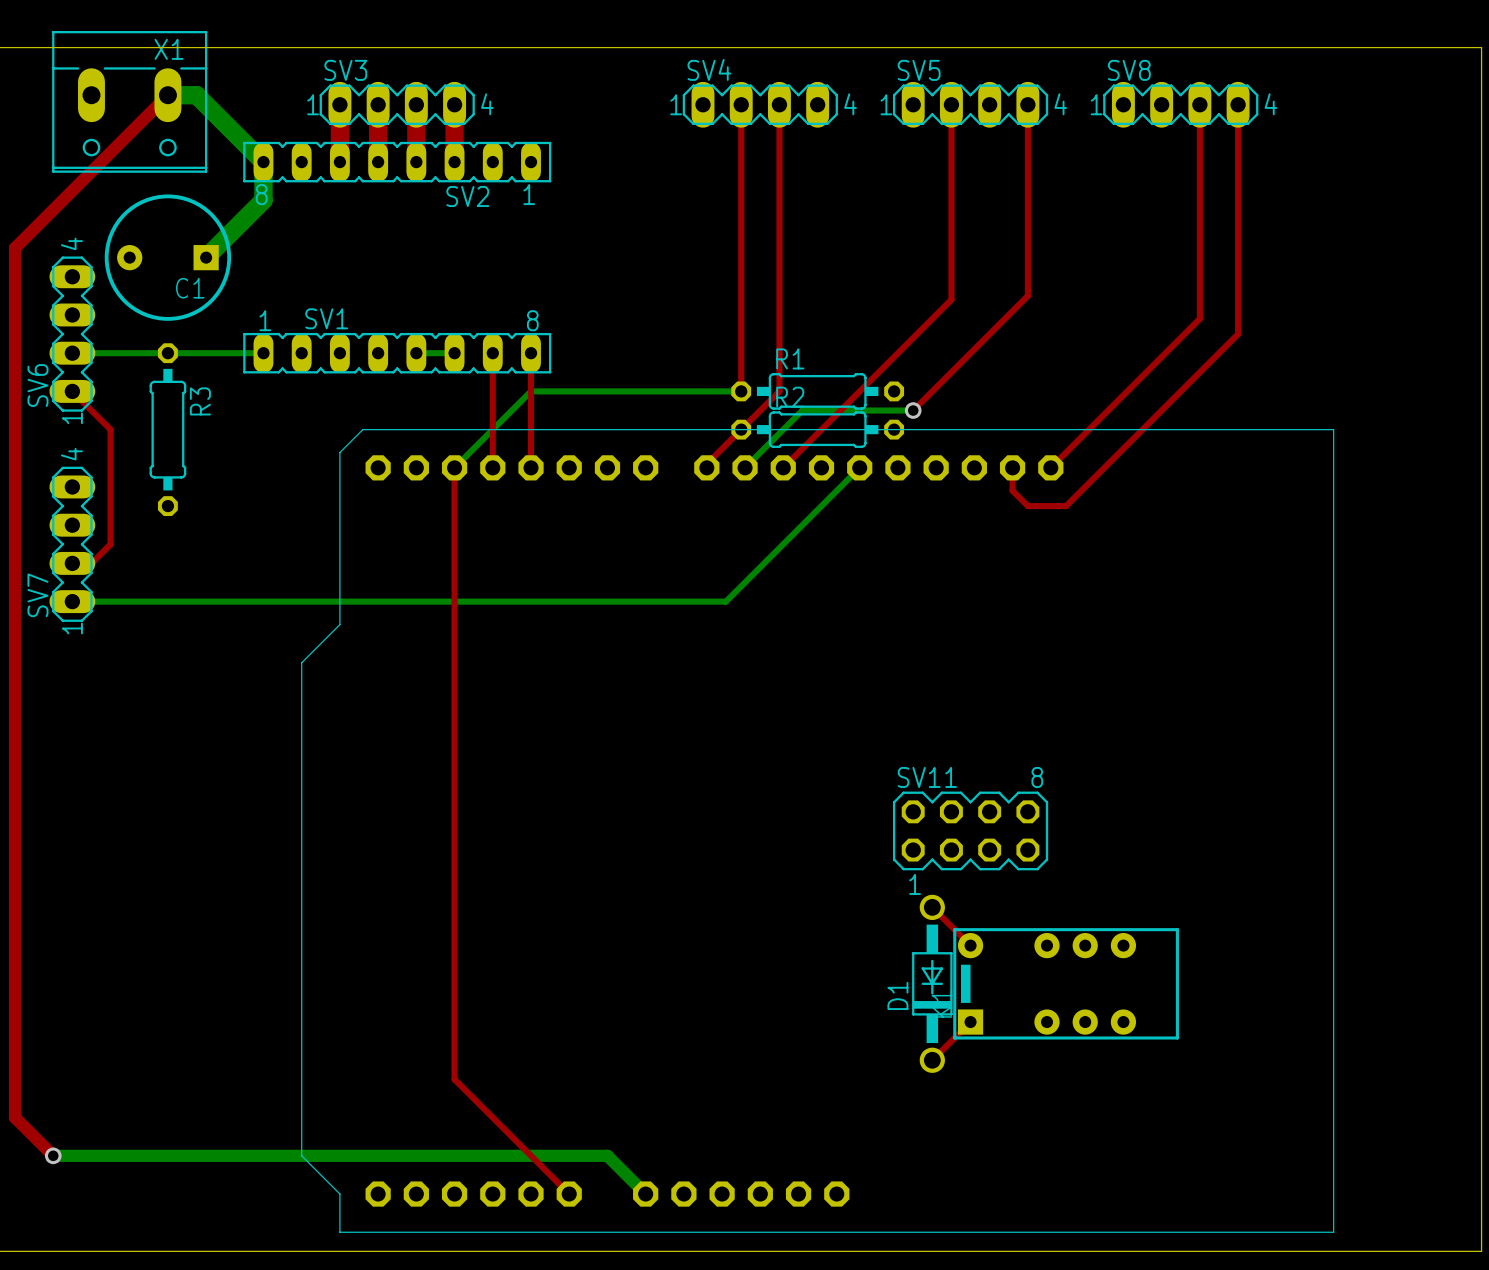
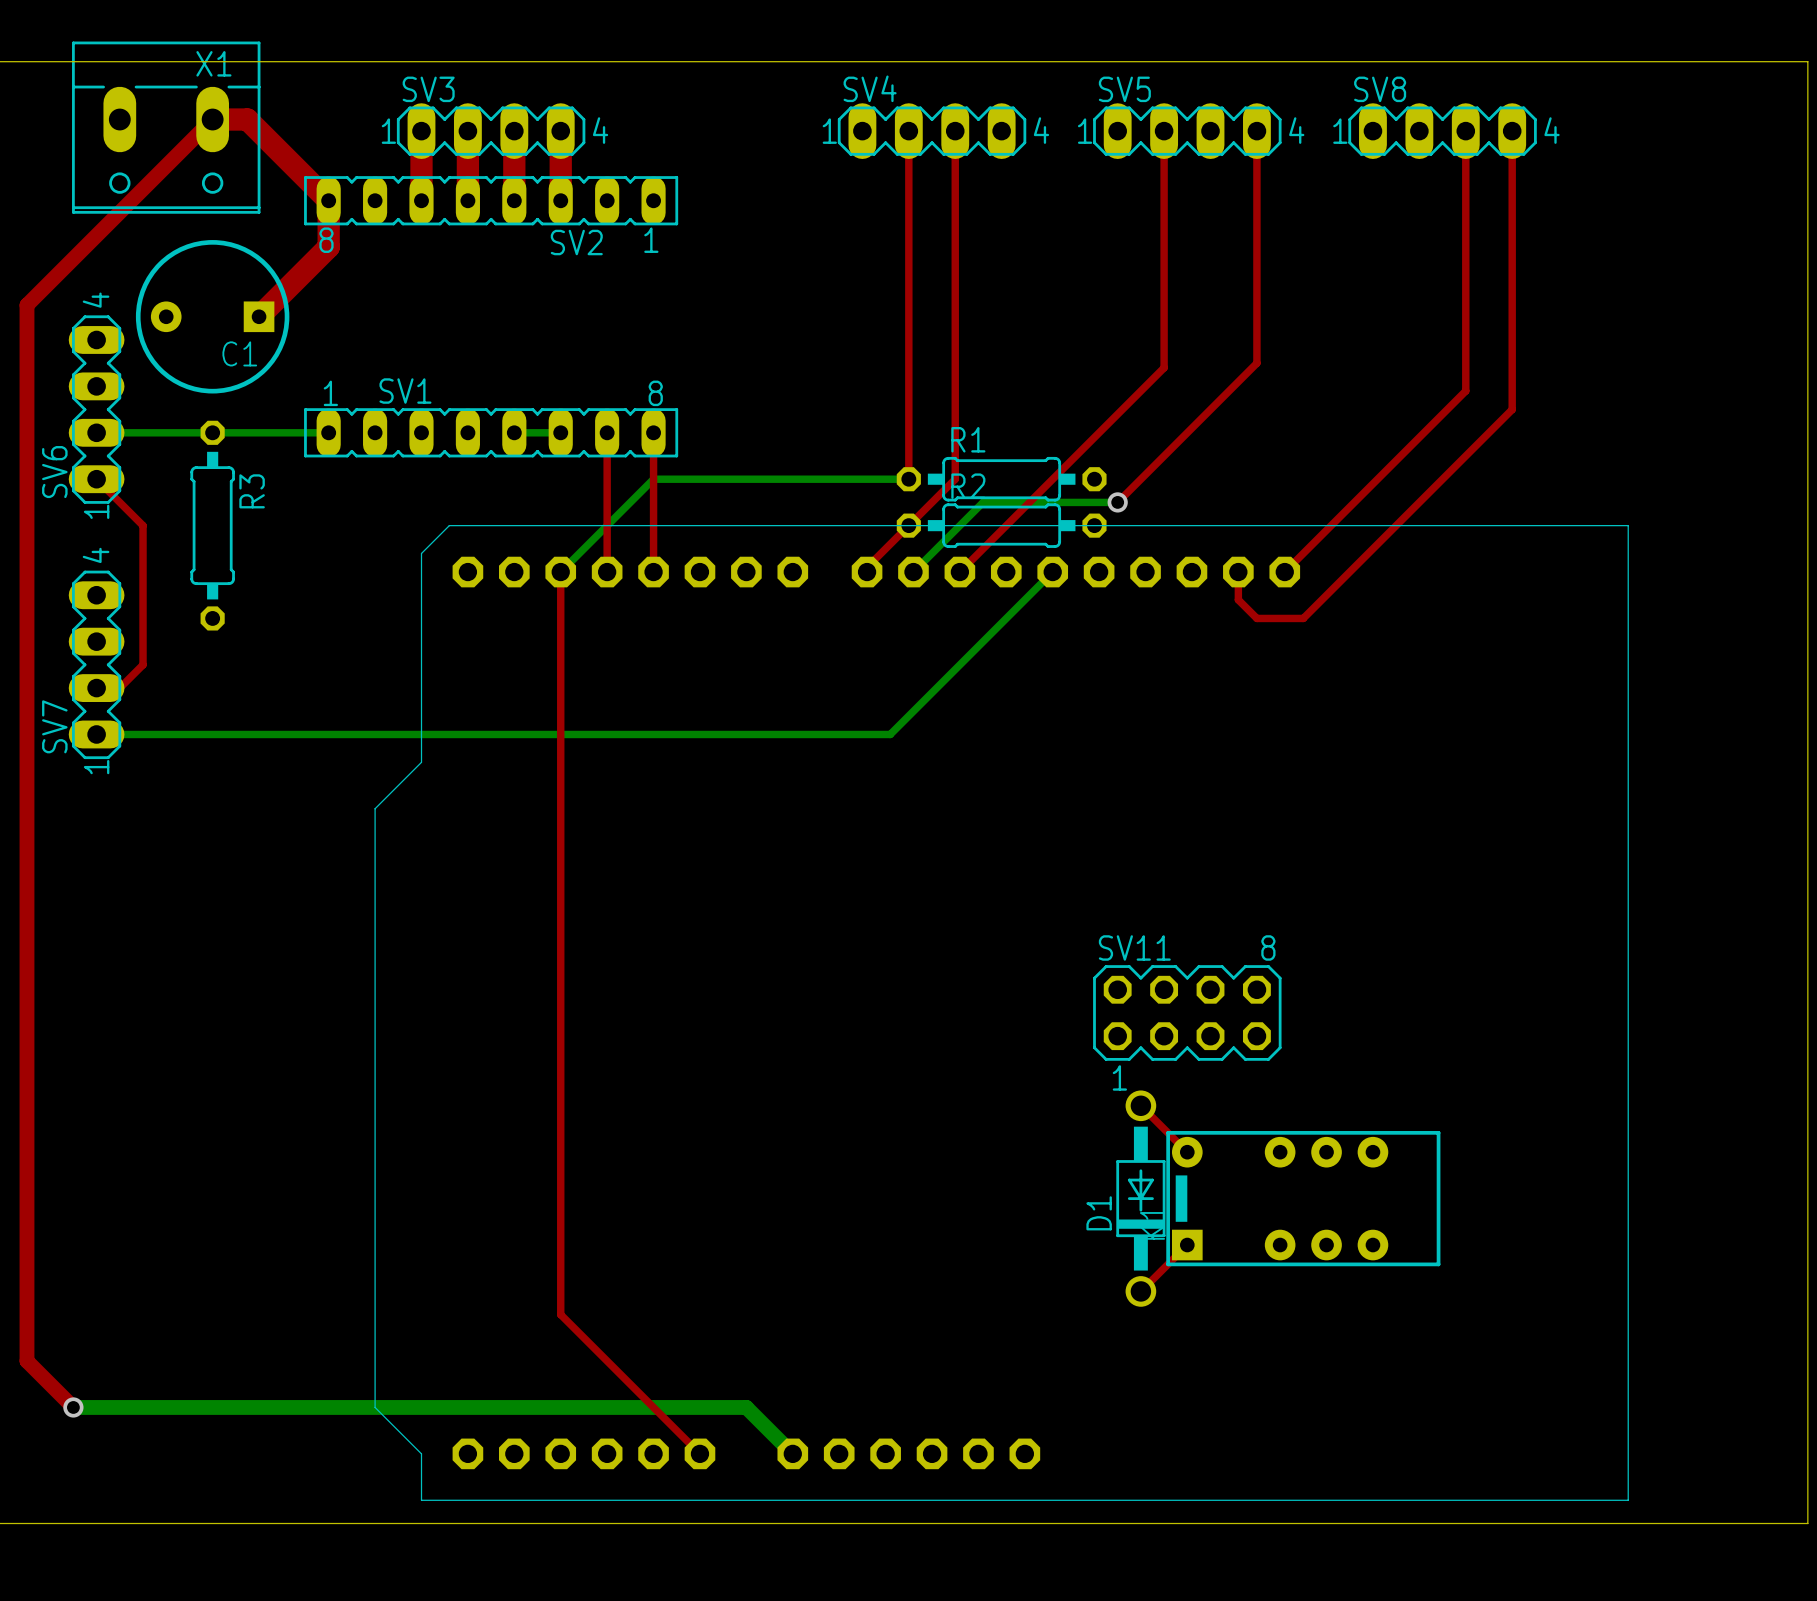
bottom track: (167, 95) (196, 95) (263, 162) (263, 200) (206, 257) -> none
top track: none -> (212, 119) (247, 119) (328, 200) (328, 247) (259, 316)

